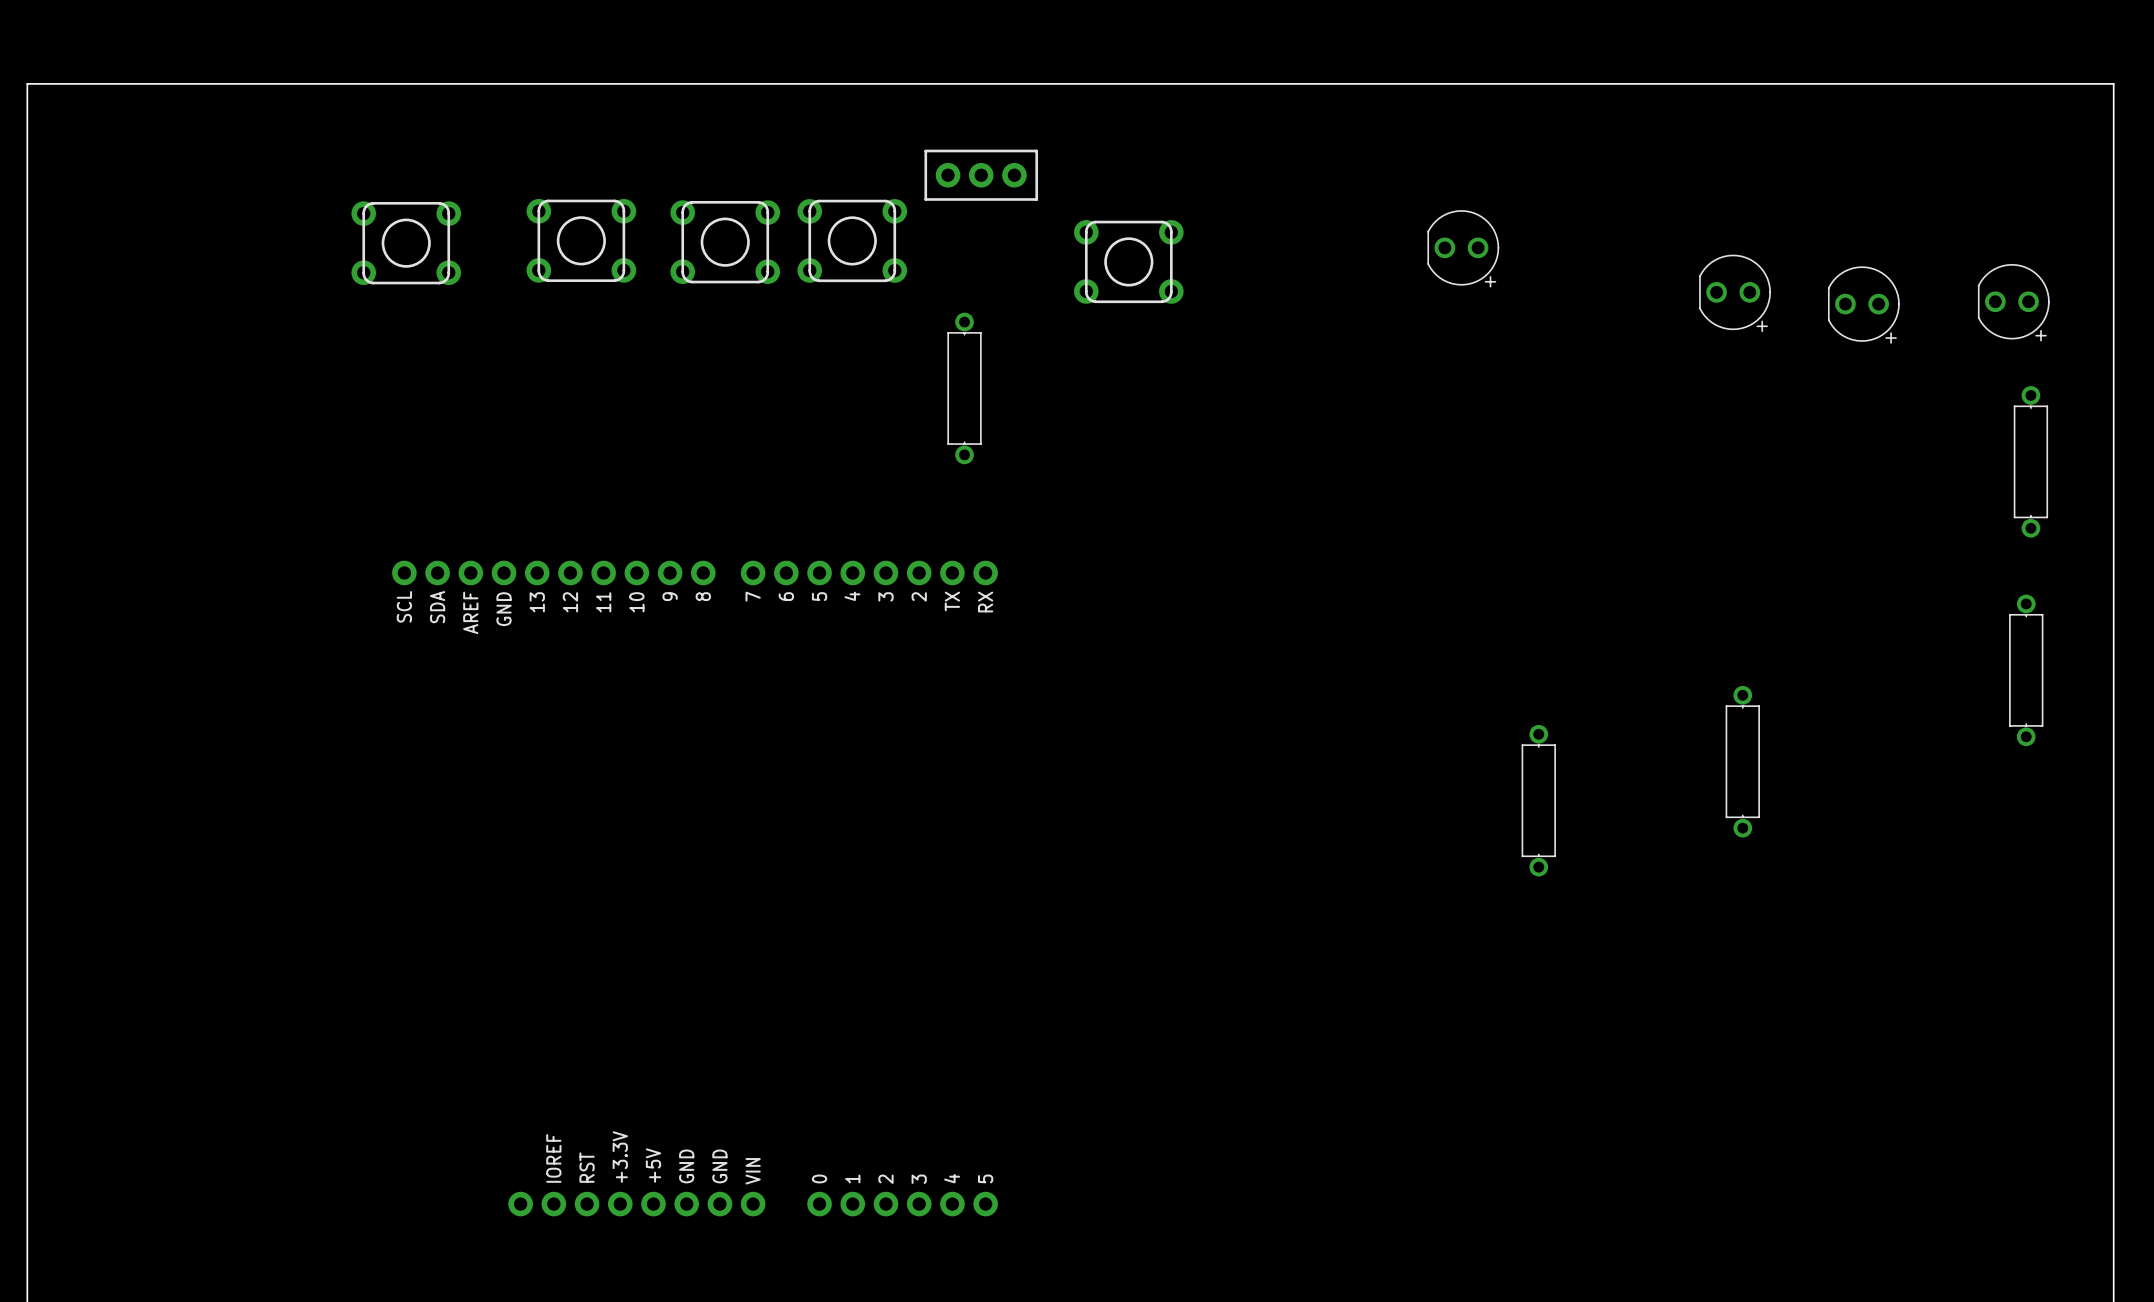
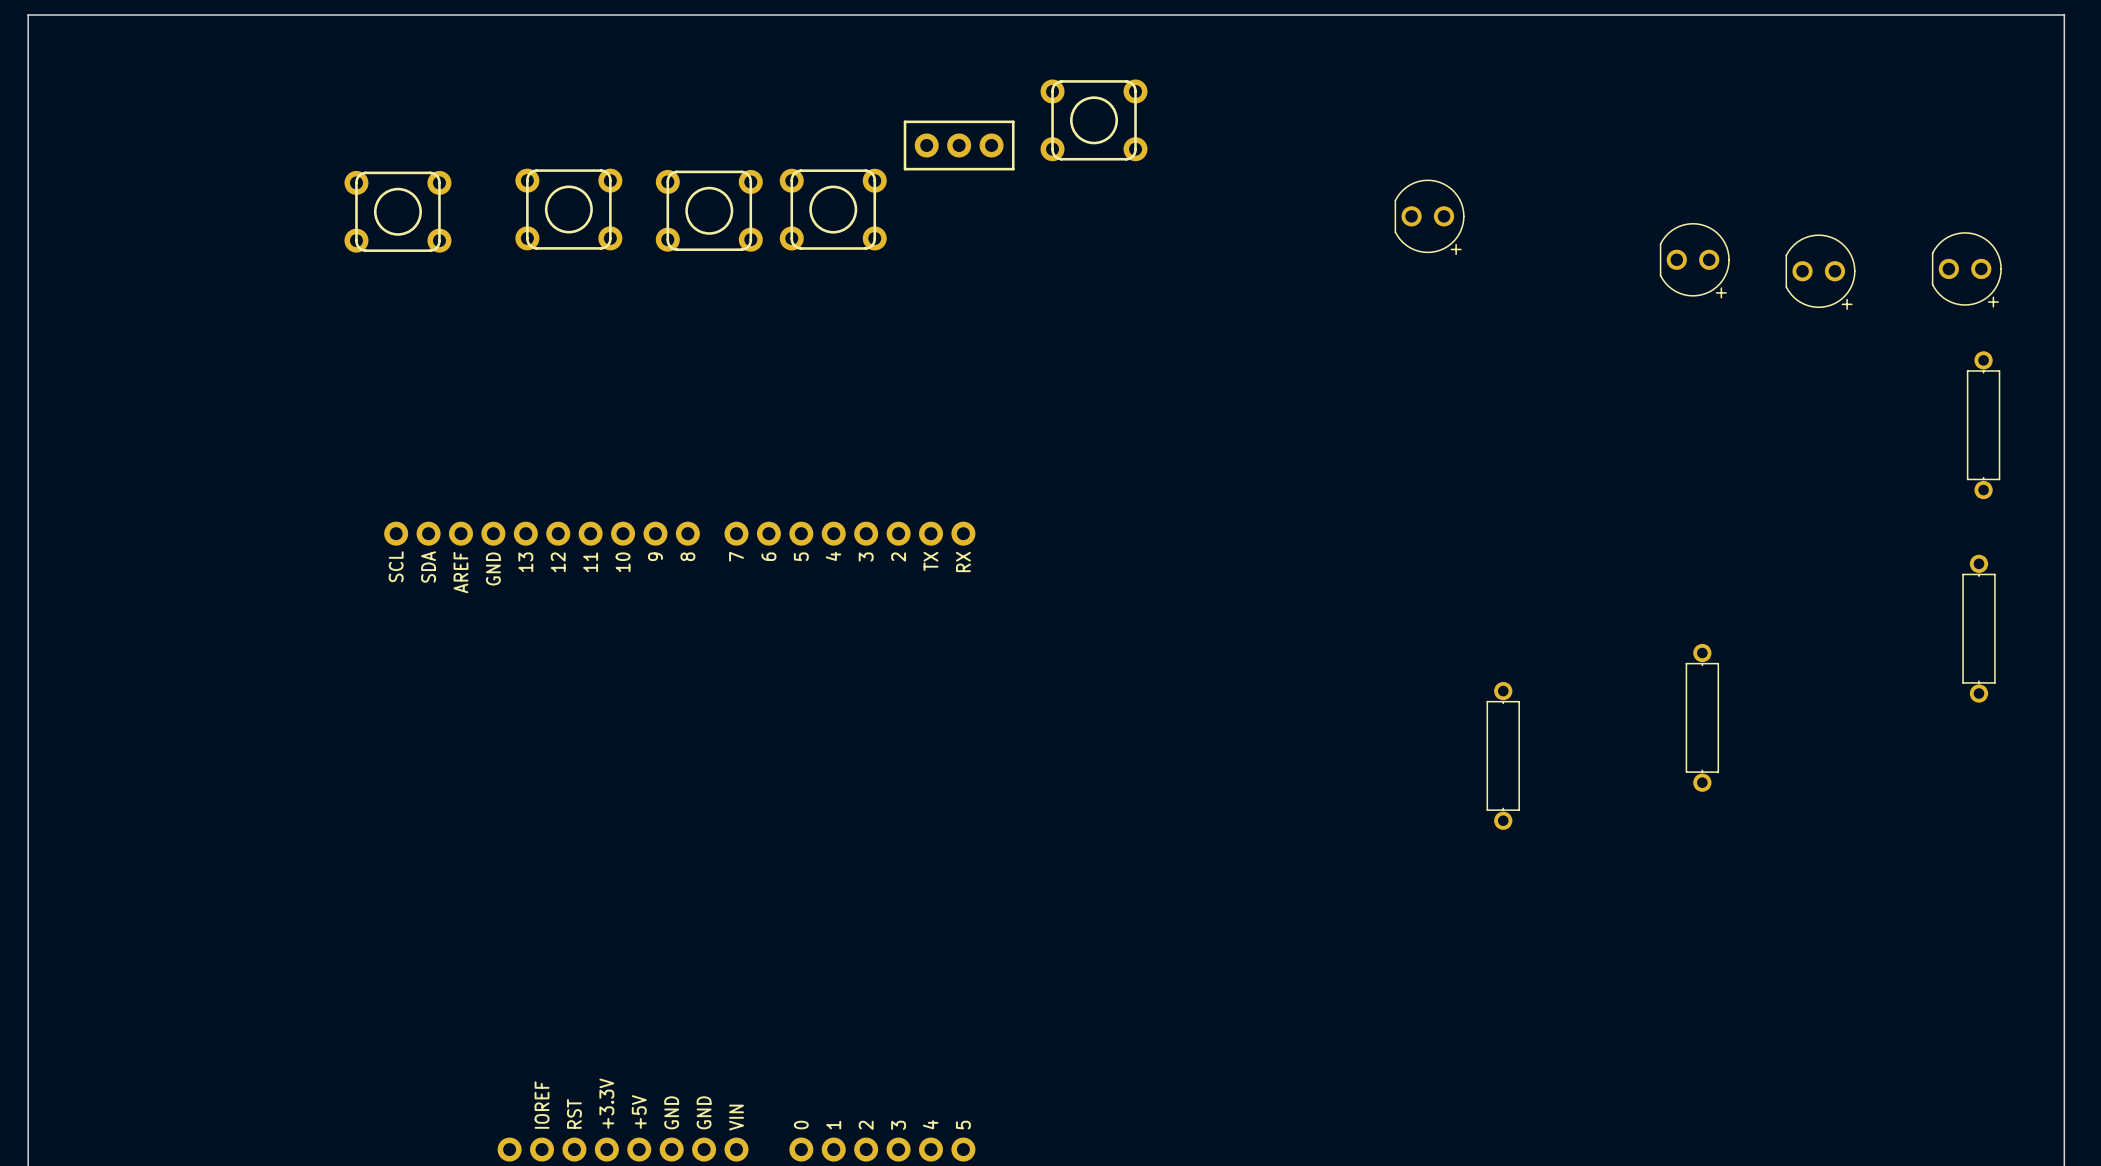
board edge: (27, 83) (2113, 83) -> (28, 56) (28, 14) (2064, 14) (2064, 56)
part position: (1128, 261) -> (1094, 120)
part: (964, 388) -> none

